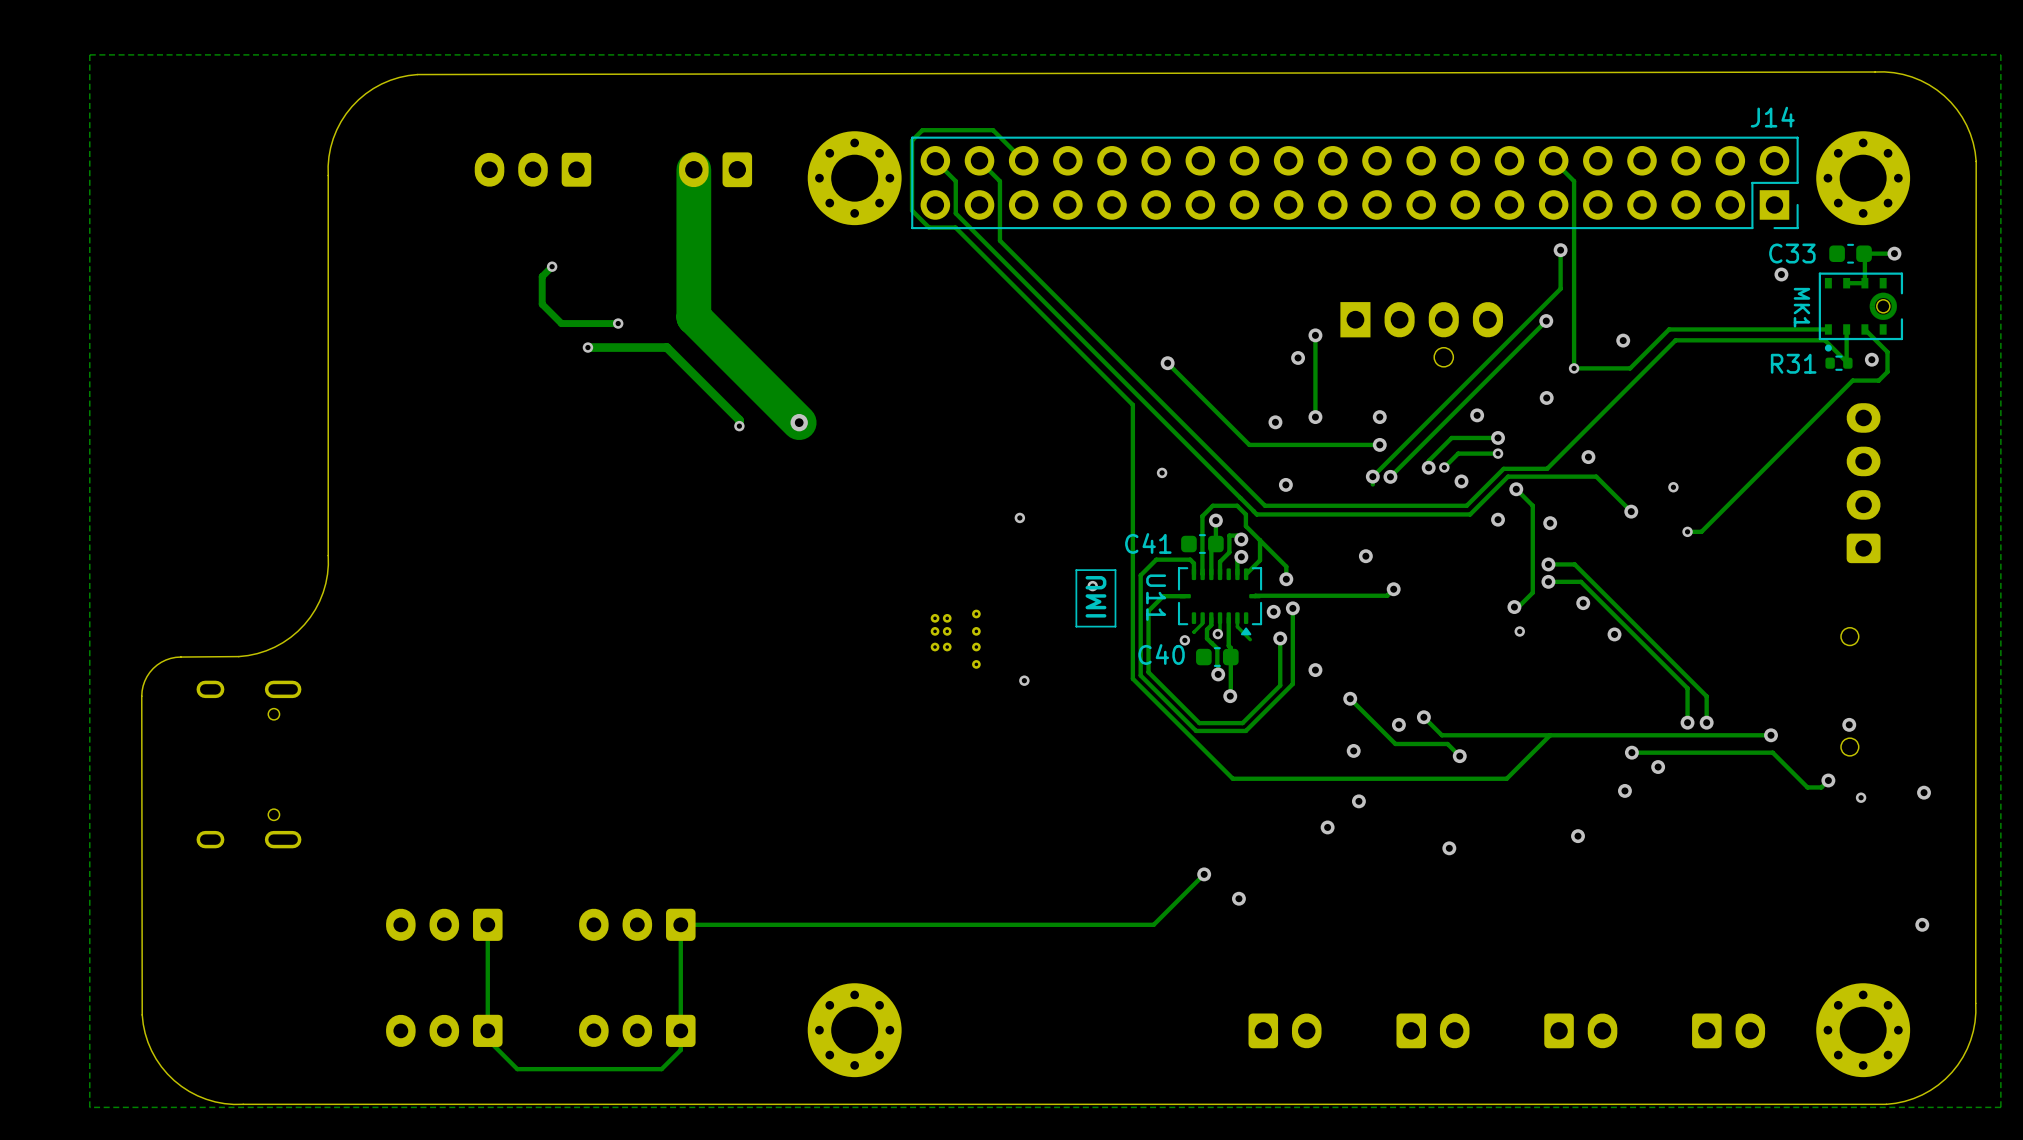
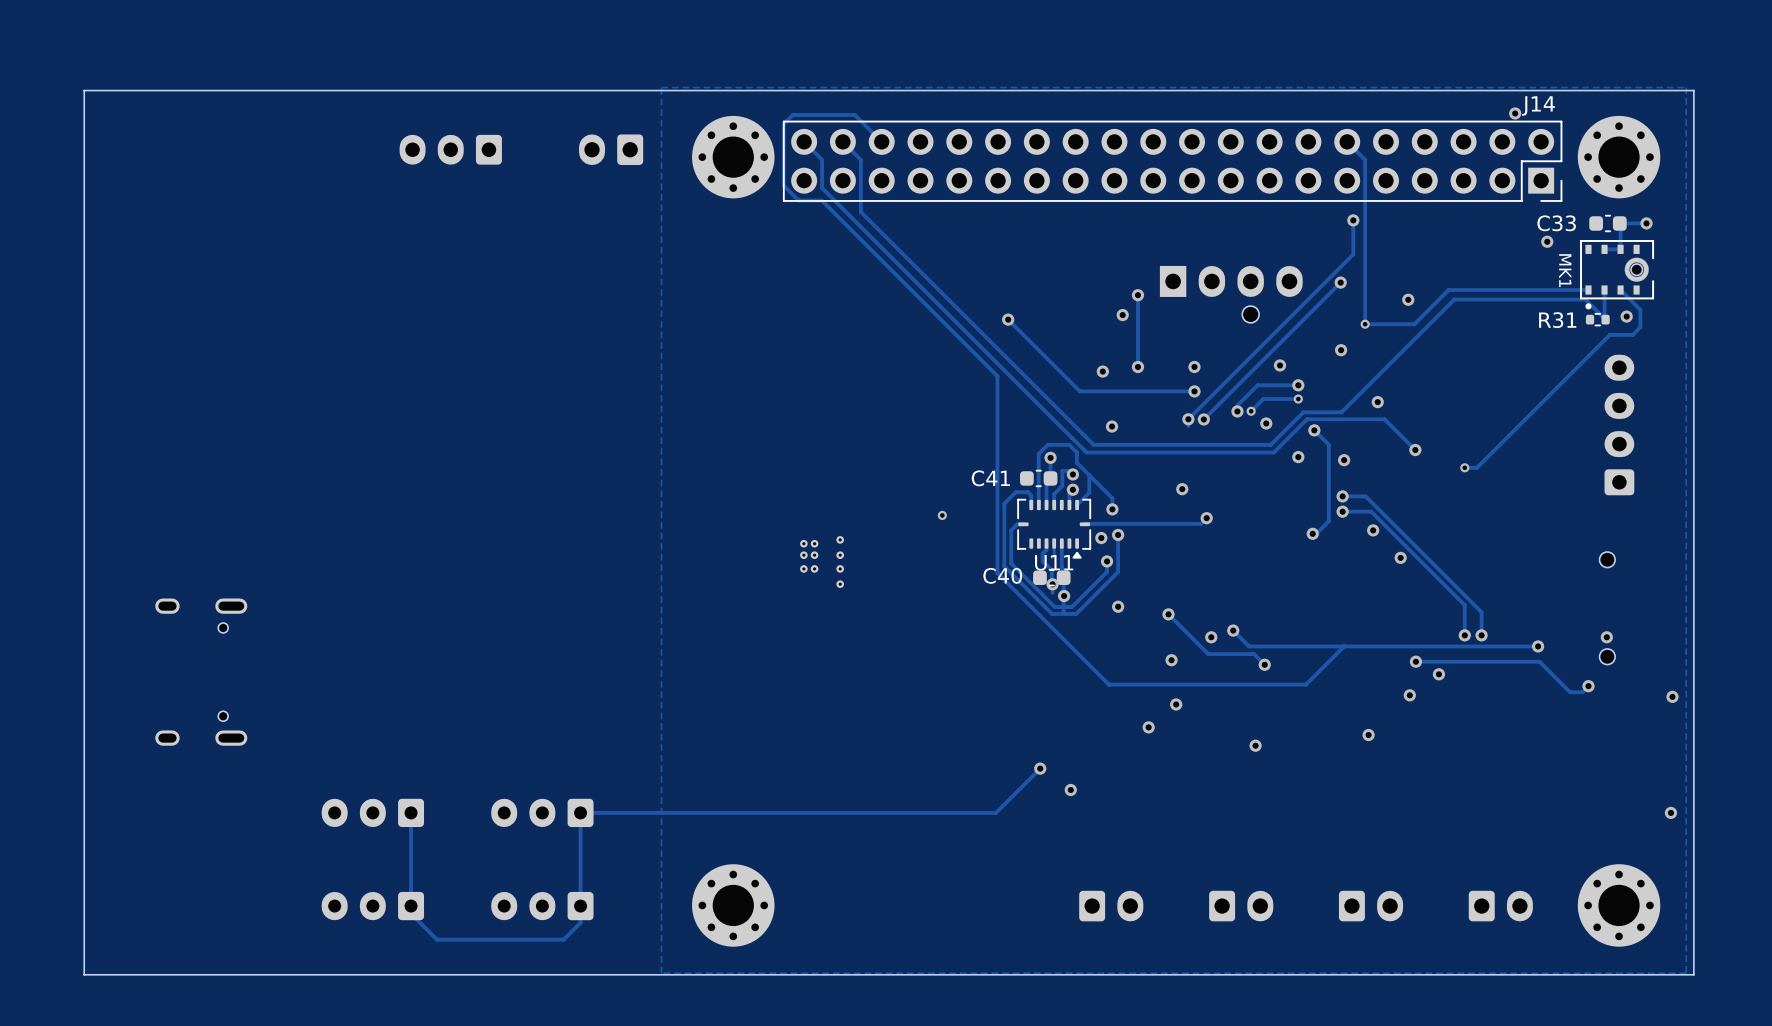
board edge: (1875, 72) (417, 74) (399, 77) (373, 88) (352, 106) (341, 121) (333, 138) (328, 156) (328, 564) (323, 592) (315, 609) (304, 624) (290, 637) (274, 647) (257, 653) (238, 656) (170, 658) (153, 668) (143, 686) (142, 1014) (147, 1042) (156, 1059) (174, 1080) (189, 1091) (206, 1099) (233, 1104) (1886, 1104) (1913, 1098) (1930, 1090) (1945, 1079) (1962, 1057) (1970, 1040) (1975, 1012) (1976, 161) (1973, 142) (1966, 125) (1956, 109) (1944, 95) (1929, 84) (1912, 77) (1893, 72) (1875, 72) -> (1693, 90) (1693, 974) (84, 974) (84, 90) (1693, 90)
via: none -> (1515, 113)
track: (693, 169) (693, 317) (799, 422) -> none
track: (552, 266) (542, 276) (542, 304) (561, 323) (618, 323) -> none
via: (552, 266) -> none
via: (618, 323) -> none
track: (587, 347) (666, 347) (739, 420) (739, 426) -> none
via: (587, 347) -> none
track: (1132, 404) (1132, 678) (1232, 778) (1282, 778) -> (977, 356) (997, 376) (997, 573) (1108, 684)
via: (799, 422) -> none
via: (739, 426) -> none
via: (1162, 472) -> none
via: (1673, 487) -> none
via: (1019, 517) -> none
track: (1176, 559) (1156, 559) (1140, 575) (1140, 675) (1196, 730) (1245, 730) (1292, 683) (1292, 650) -> (1015, 492) (1004, 503) (1004, 566) (1052, 613) (1076, 613) (1118, 572)
line: (1115, 570) (1076, 570) (1076, 626) (1115, 626) (1115, 570) -> none
text: IMU (1095, 596) -> none
track: (1178, 596) (1163, 596) (1148, 610) (1148, 672) (1199, 723) (1242, 723) (1280, 685) (1280, 650) -> (1017, 524) (1011, 530) (1011, 563) (1054, 607) (1071, 607) (1078, 600)
U11 name rotation: 0° (1156, 597) -> 90° counterclockwise (1054, 562)
U11 name position: U11 (1156, 597) -> U11 (1054, 562)
track: (1202, 618) (1202, 623) (1194, 632) -> none
track: (1237, 618) (1237, 626) (1250, 639) -> none
via: (1519, 631) -> none
via: (1217, 634) -> none
via: (1184, 640) -> none
track: none -> (1107, 572) (1078, 600)
via: none -> (1052, 584)
via position: (1315, 670) -> (1118, 606)
via: (1218, 674) -> none
via: none -> (1064, 596)
via: (1024, 680) -> none
via: (1230, 696) -> none
via: (1861, 797) -> none
zone outline: (1939, 1107) (2000, 1107) (2000, 54) (89, 54) (89, 1107) (772, 1107) -> (1686, 973) (1686, 87) (661, 87) (661, 973)

